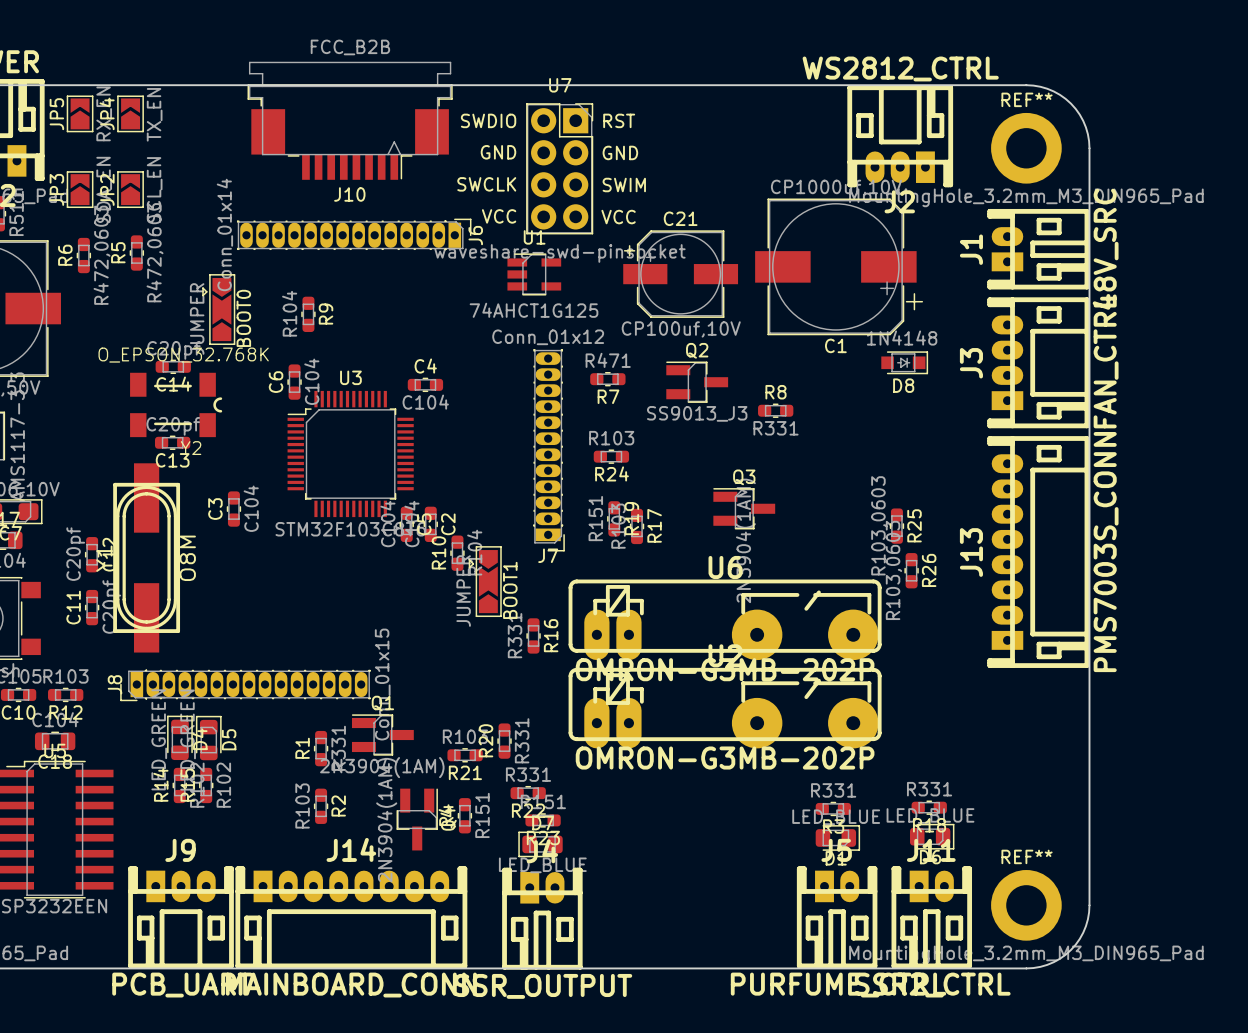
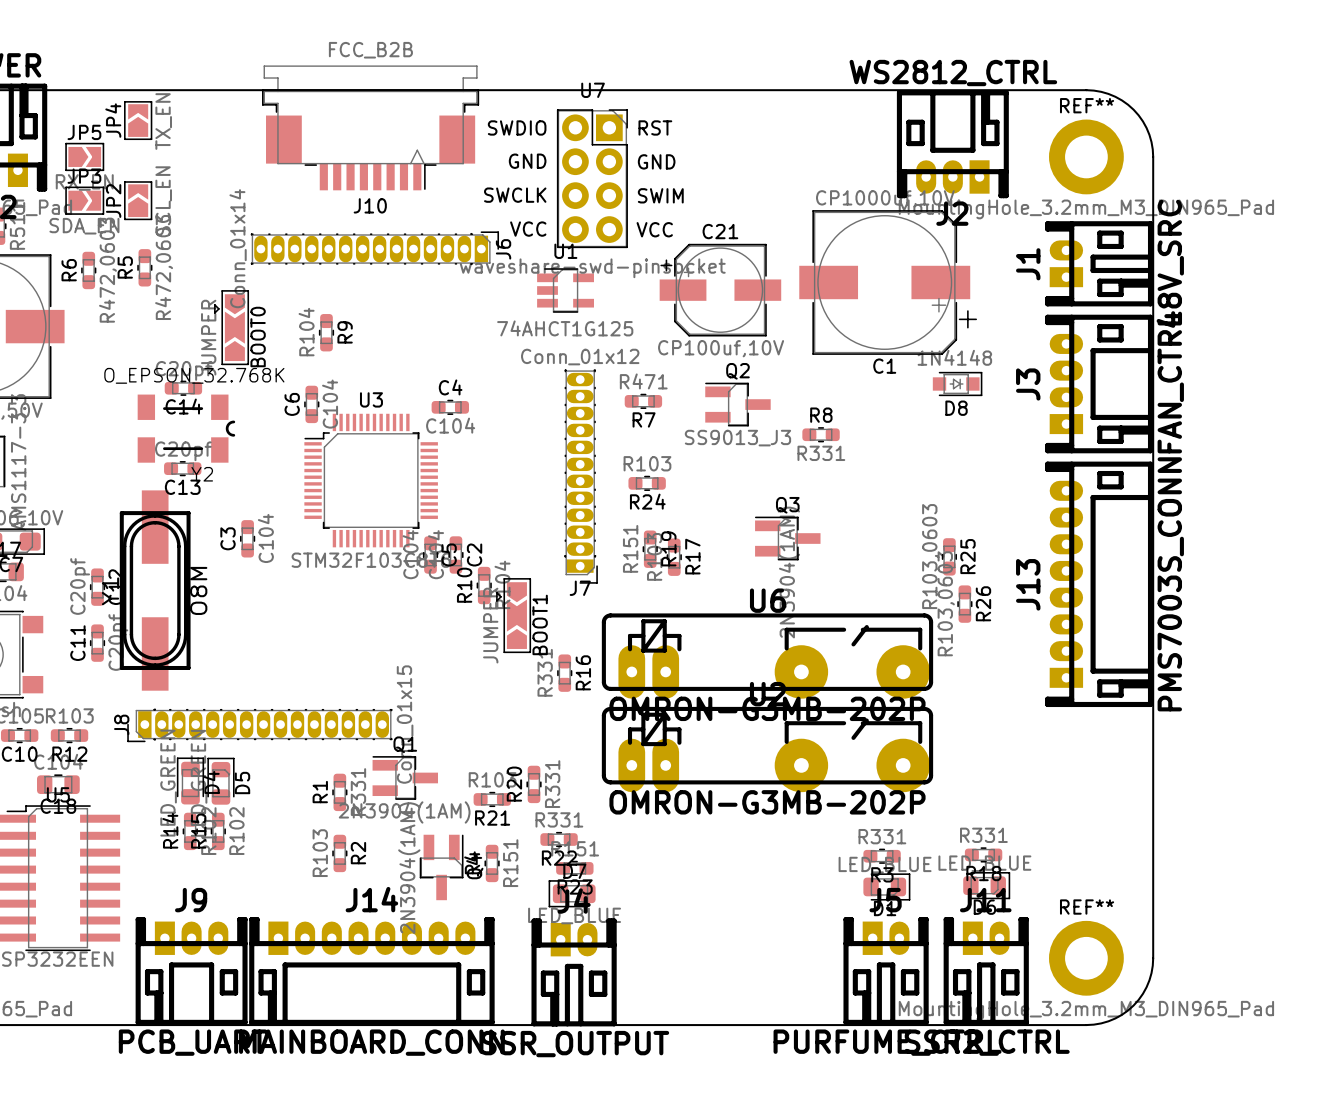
JP5 rotation: 0° (80, 113) -> 90° clockwise (84, 156)
JP5 position: (80, 113) -> (84, 156)
JP3 rotation: 0° (80, 189) -> 90° clockwise (84, 200)

